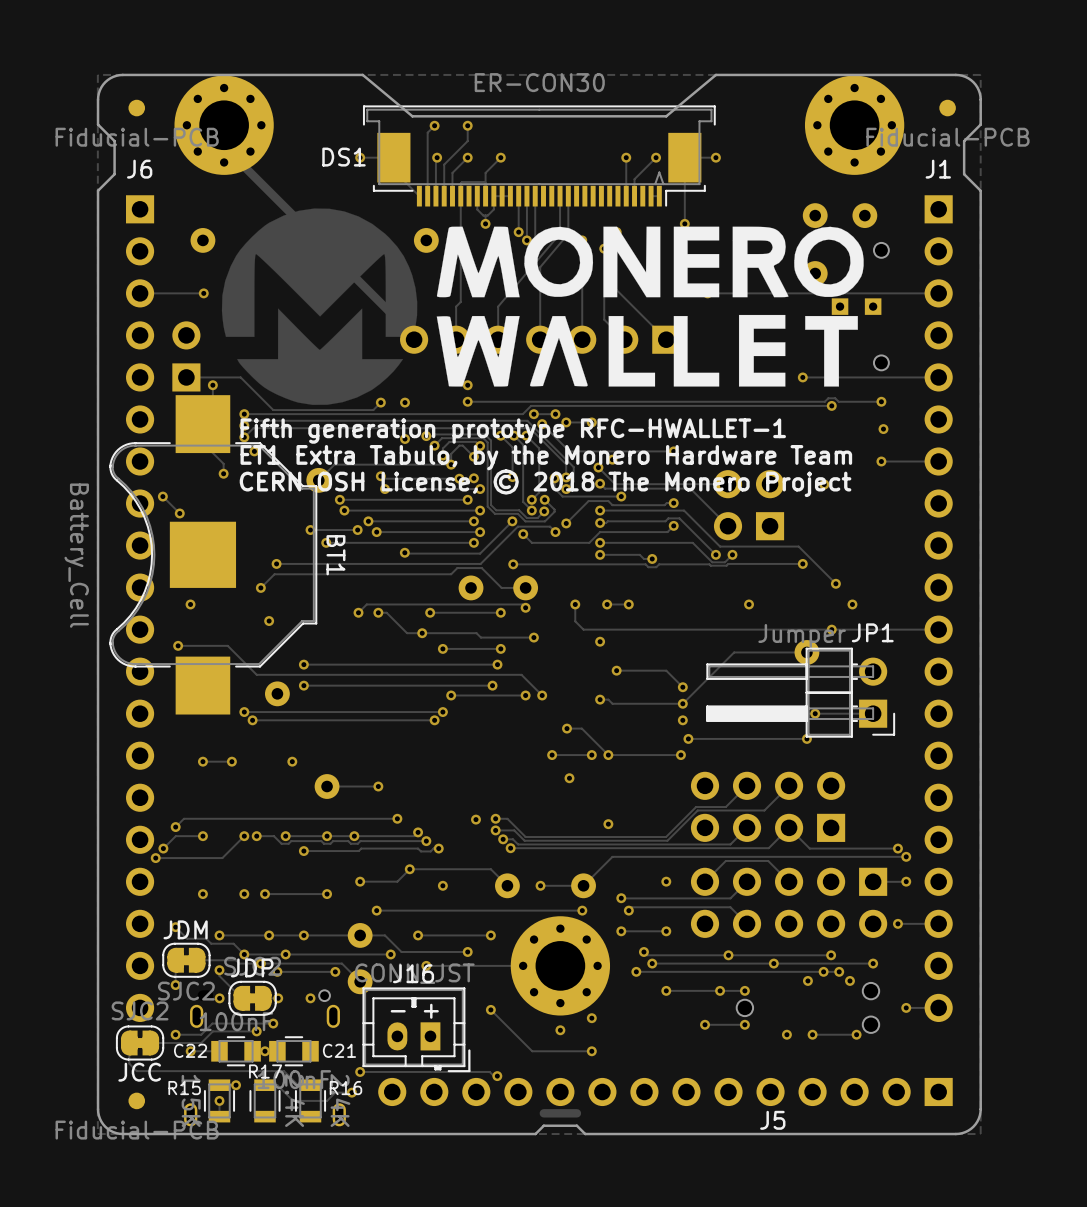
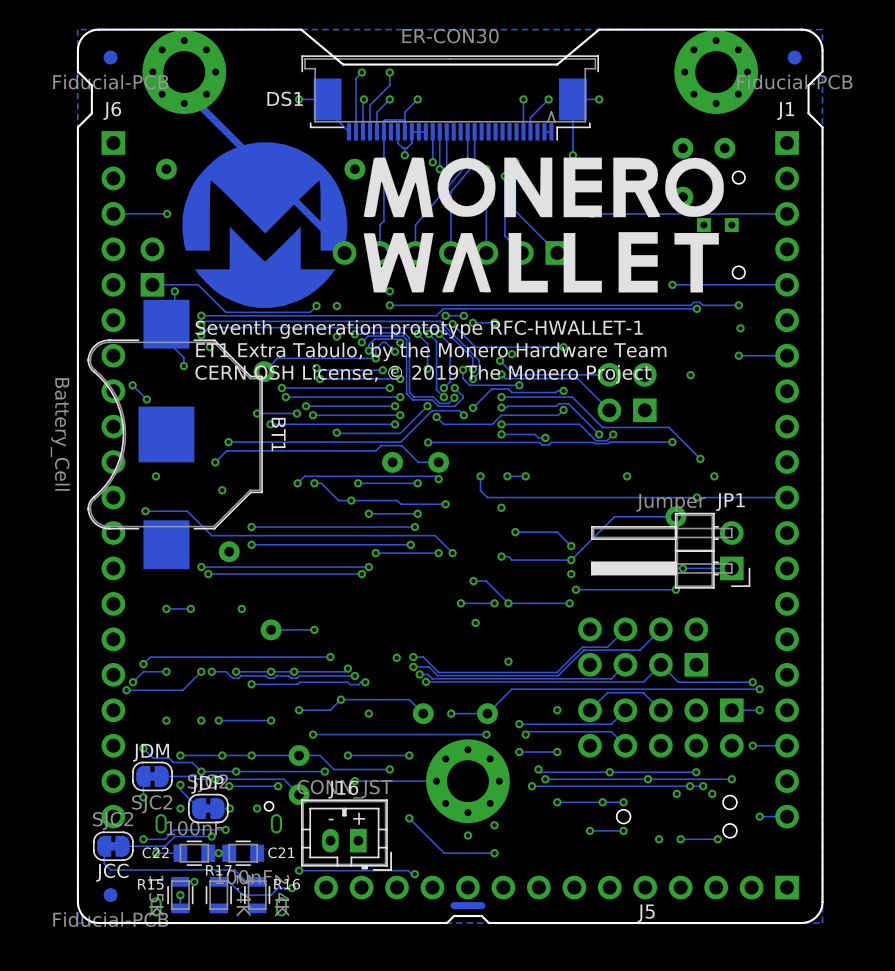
text: Fifth generation prototype RFC-HWALLET-1 (513, 431) -> Seventh generation prototype RFC-HWALLET-1 (419, 329)
text: CERN OSH License, © 2018 The Monero Project (545, 483) -> CERN OSH License, © 2019 The Monero Project (423, 374)

